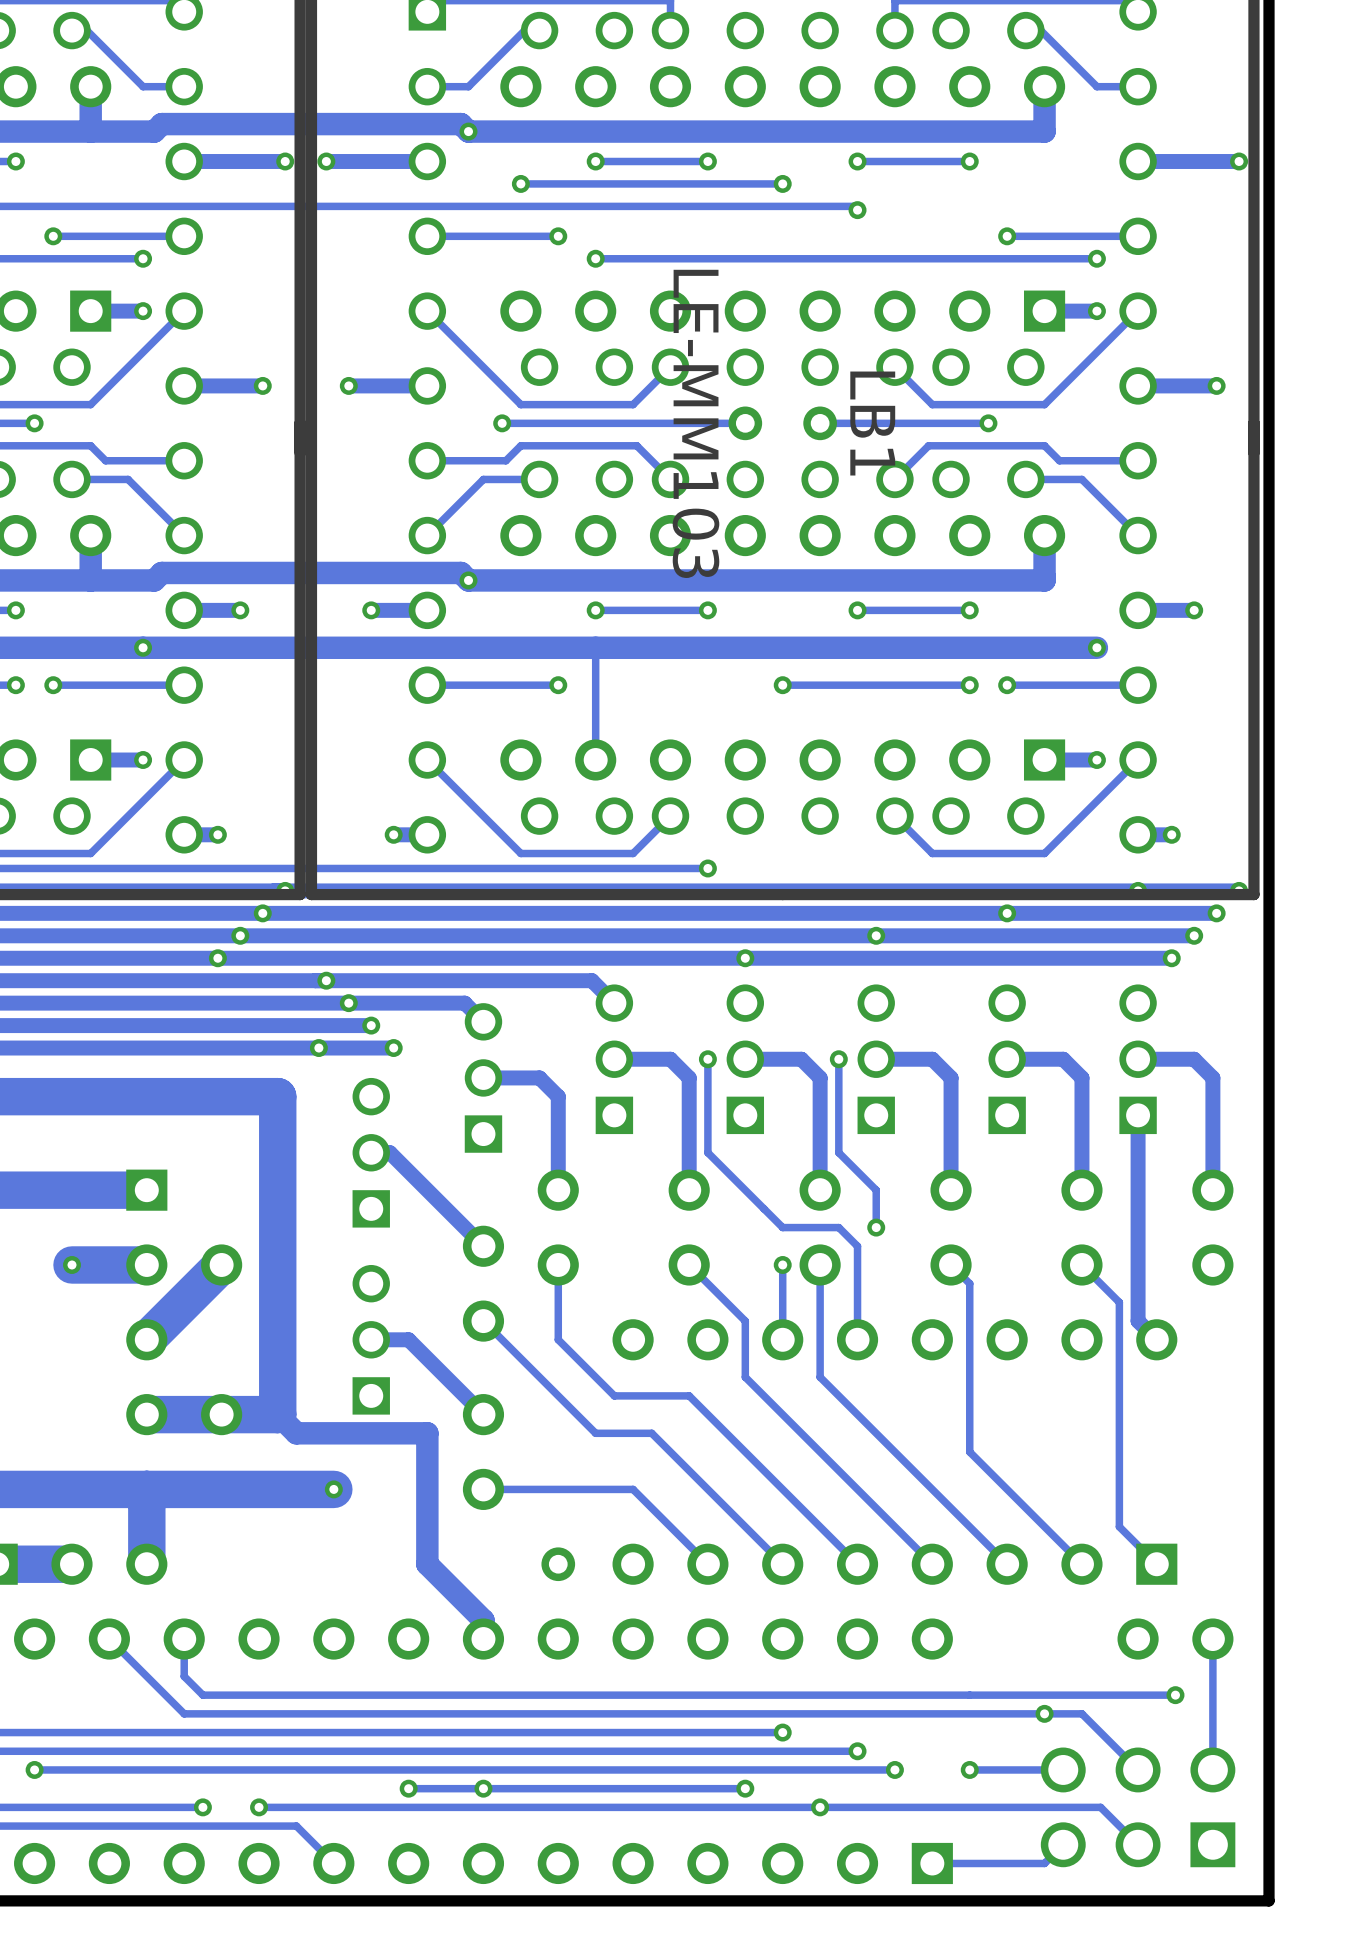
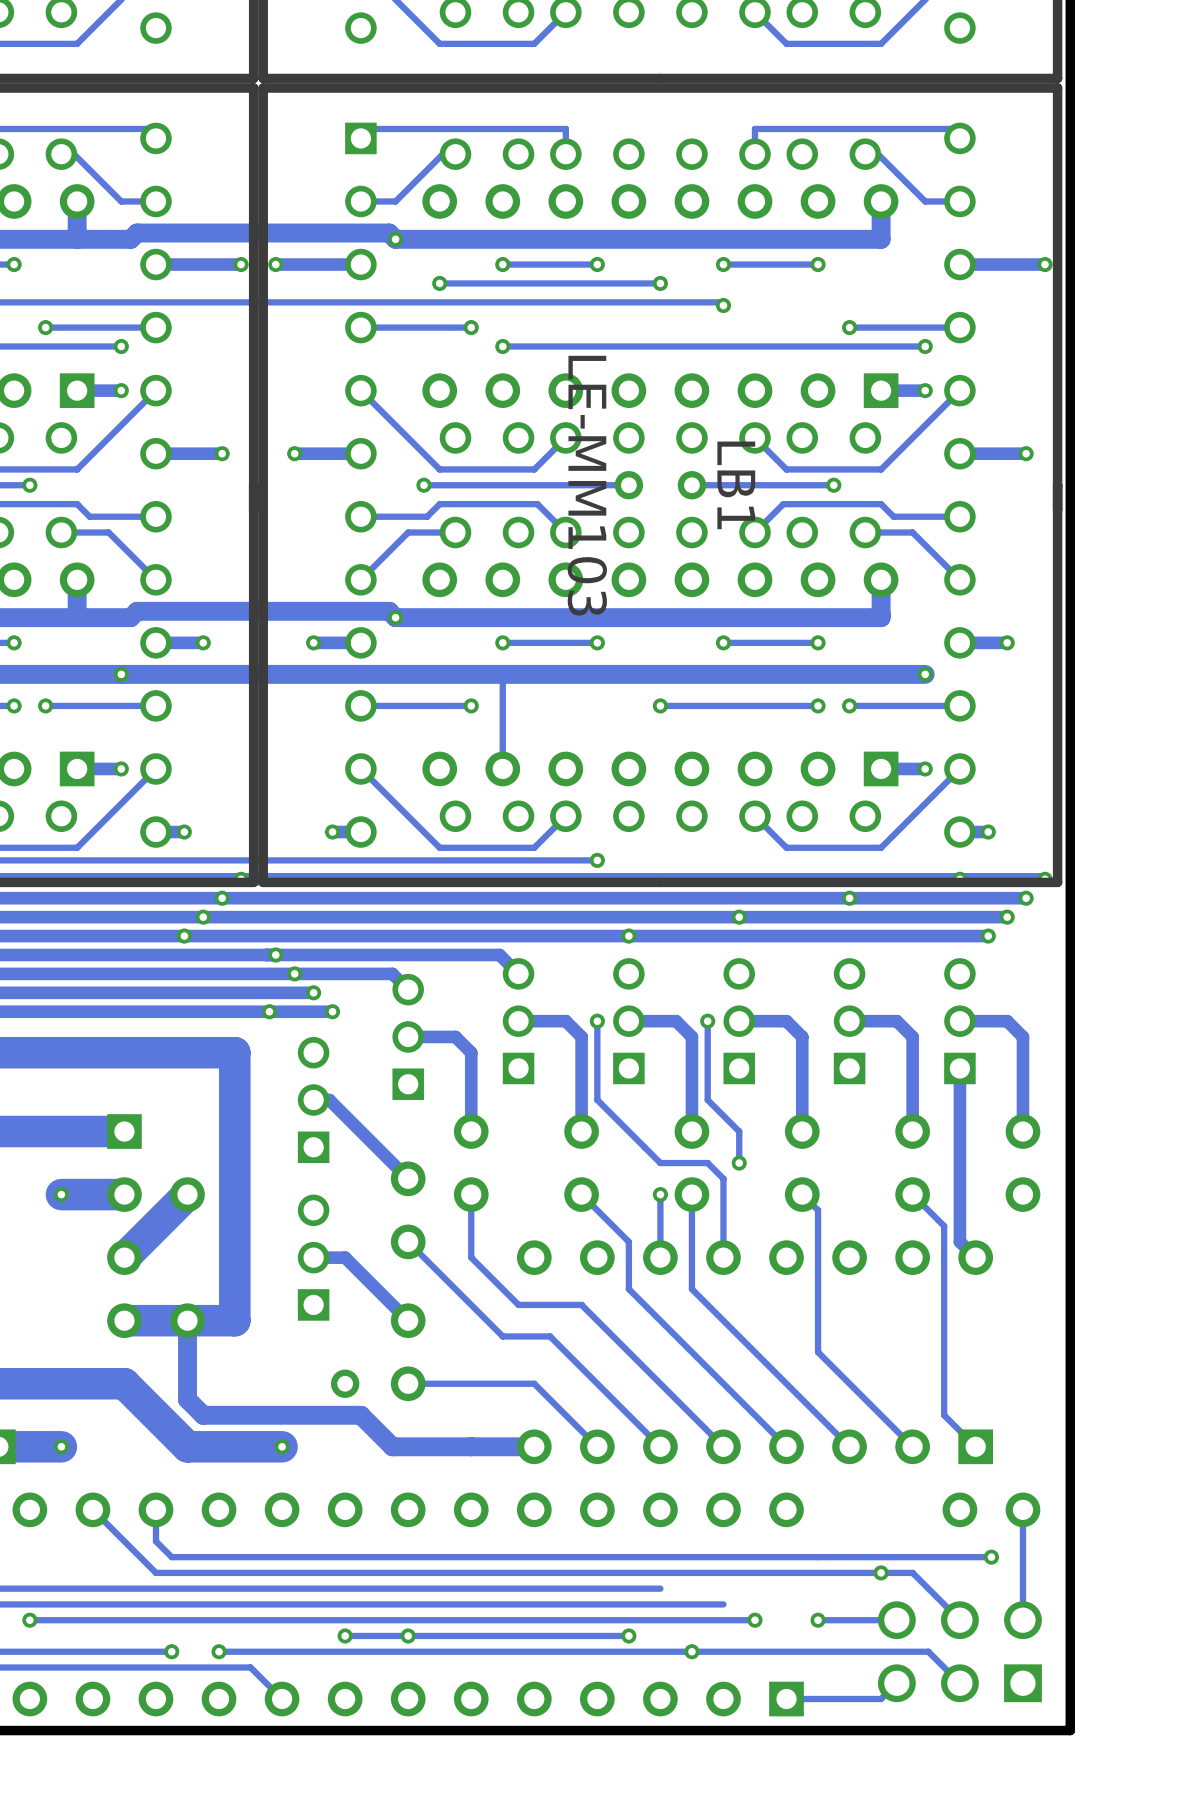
track: none -> (187, 1320) (187, 1399) (203, 1415) (360, 1415) (392, 1446) (534, 1446)
track: (277, 1414) (296, 1433) (427, 1433) (427, 1564) (483, 1620) (483, 1639) -> none
track: none -> (124, 1383) (187, 1446) (282, 1446)
track: (333, 1489) (146, 1489) (146, 1564) -> none
via position: (333, 1489) -> (282, 1446)
via: none -> (61, 1446)
part: (109, 1564) -> none
part position: (558, 1564) -> (345, 1383)
via: (782, 1732) -> none
via: (857, 1751) -> none

